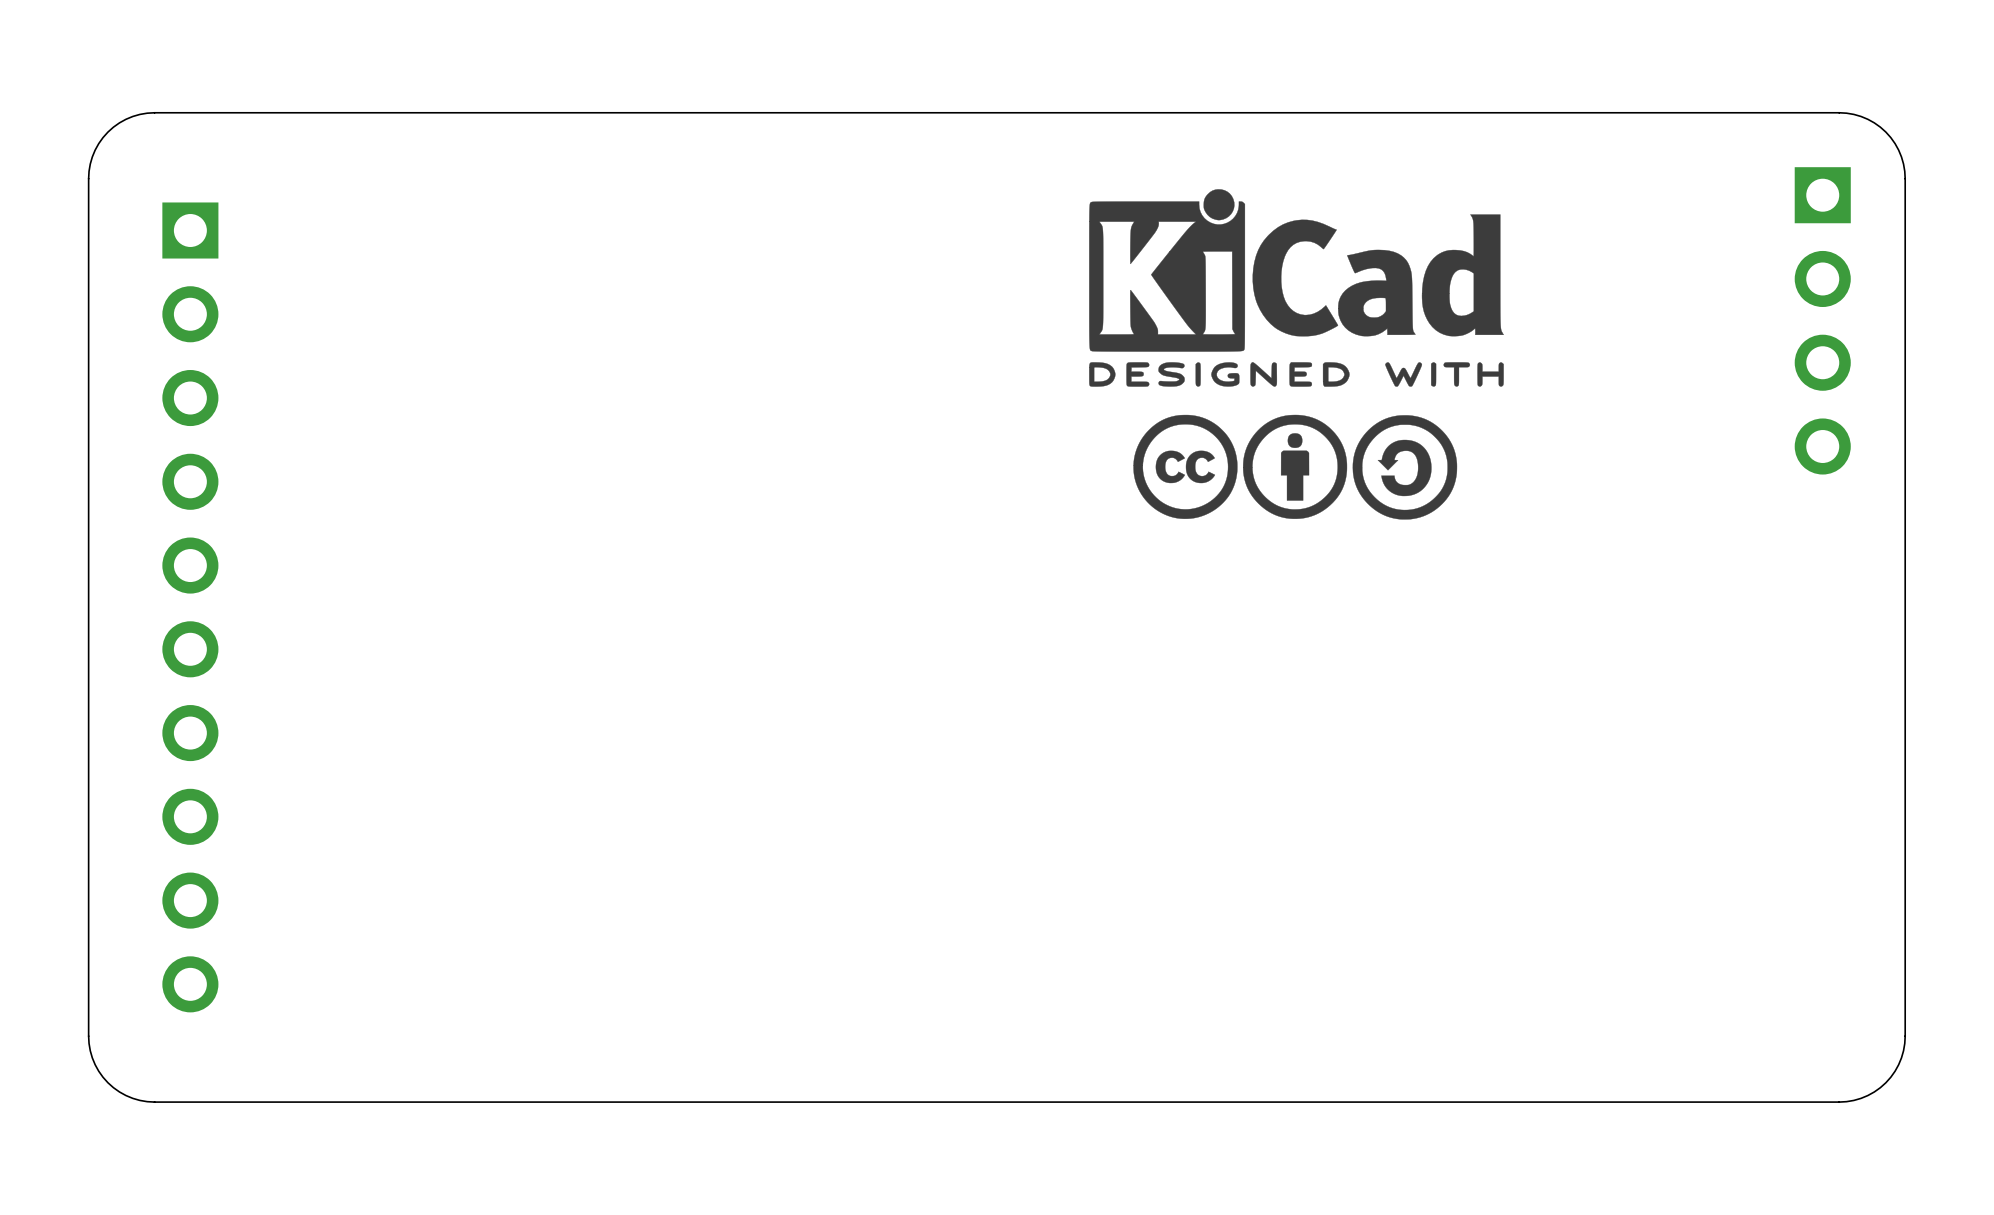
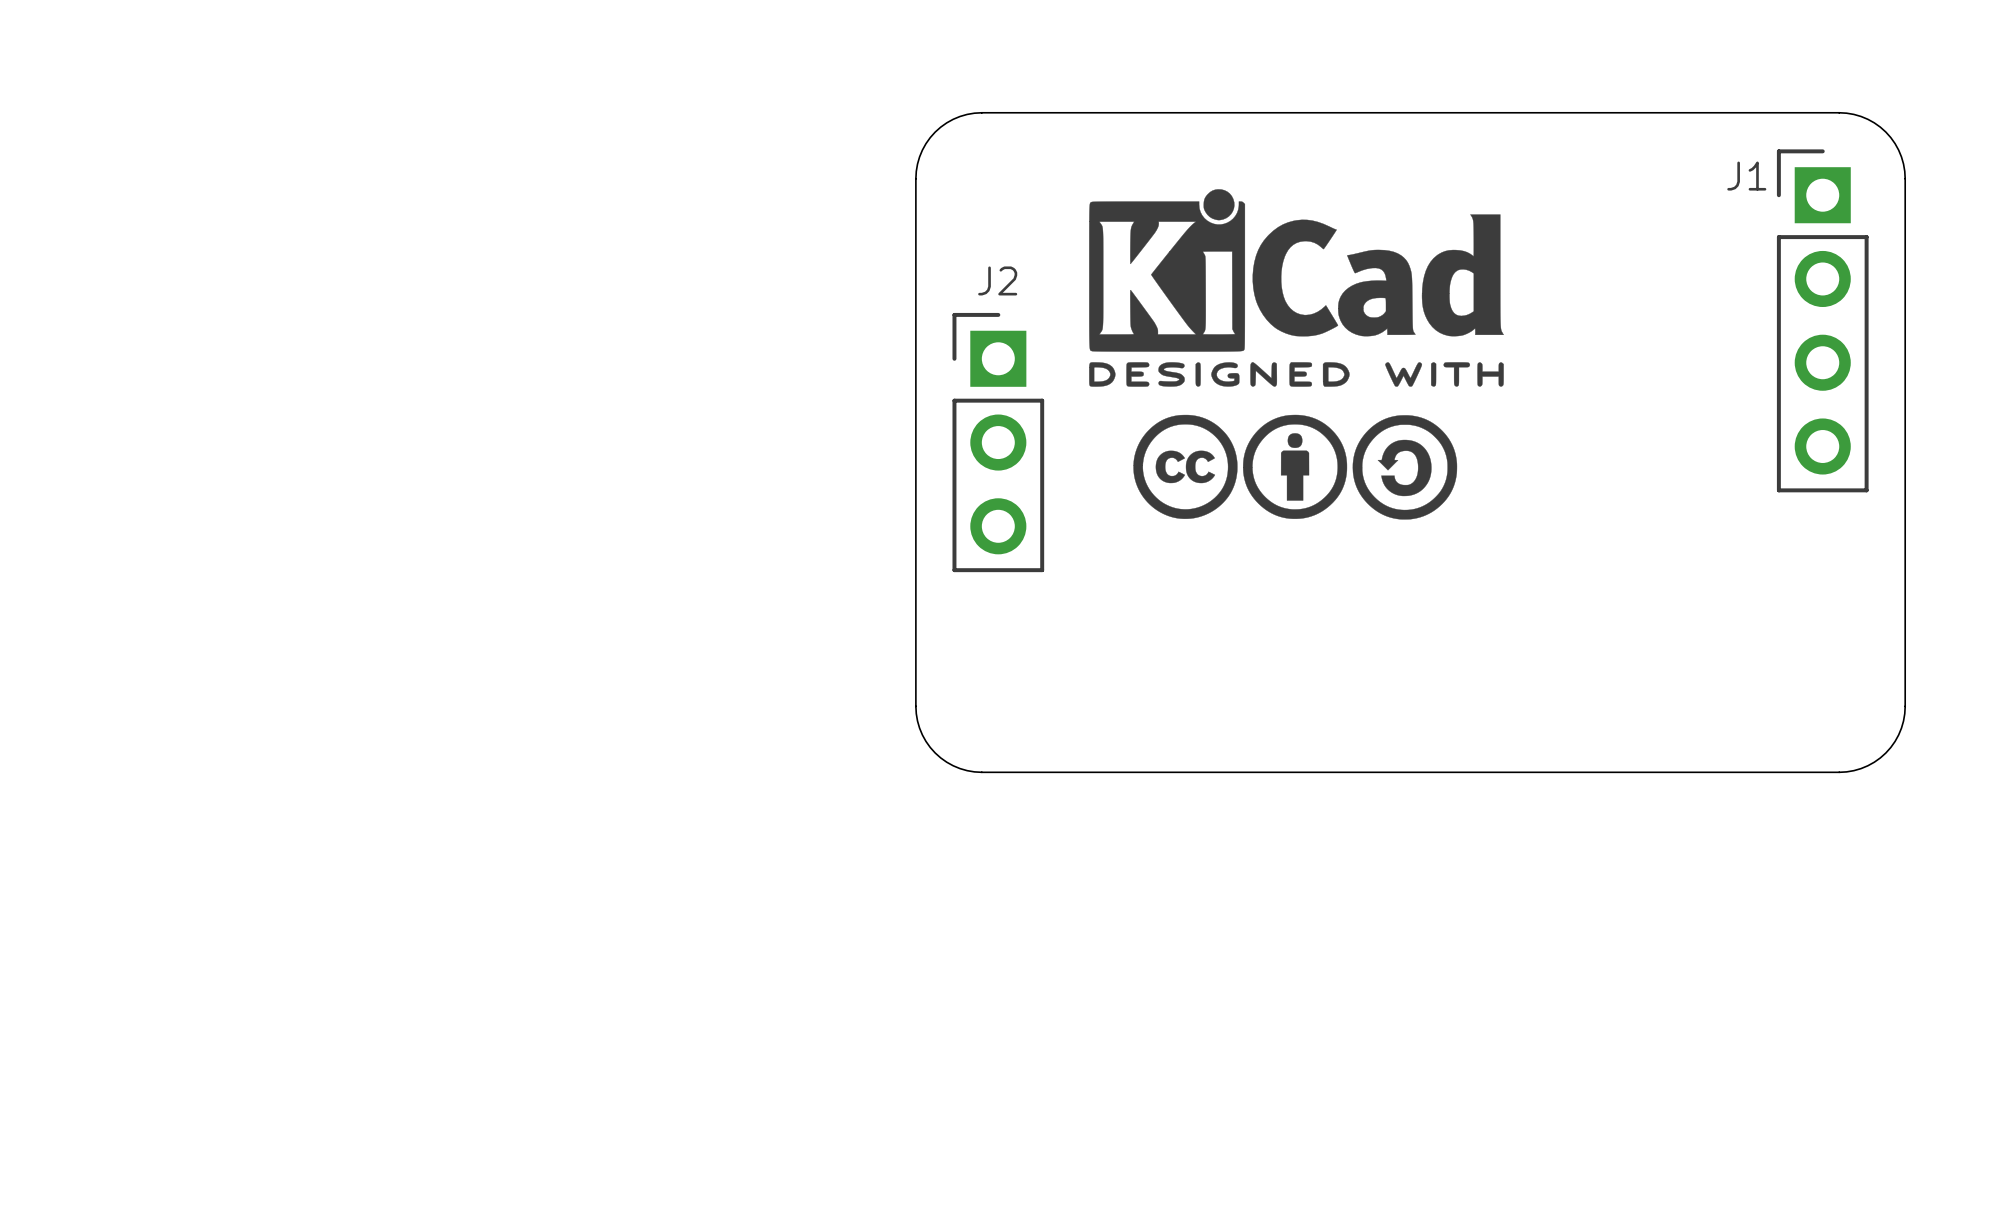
board edge: (981, 112) (154, 112) (139, 114) (125, 119) (107, 132) (98, 143) (92, 156) (88, 178) (88, 1036) (92, 1057) (98, 1071) (107, 1082) (119, 1091) (132, 1098) (154, 1102) (1839, 1102) (1853, 1100) (1874, 1091) (1890, 1077) (1901, 1057) (1904, 1043) (1905, 706) -> (981, 112) (967, 114) (953, 119) (935, 132) (925, 143) (919, 156) (915, 178) (915, 706) (917, 721) (922, 734) (935, 752) (946, 762) (967, 770) (981, 772) (1846, 771) (1861, 768) (1874, 762) (1890, 747) (1901, 728) (1905, 706)
J1 side: top (1822, 320) -> bottom (1822, 320)
J2: none -> (998, 442)
part: (190, 607) -> none

